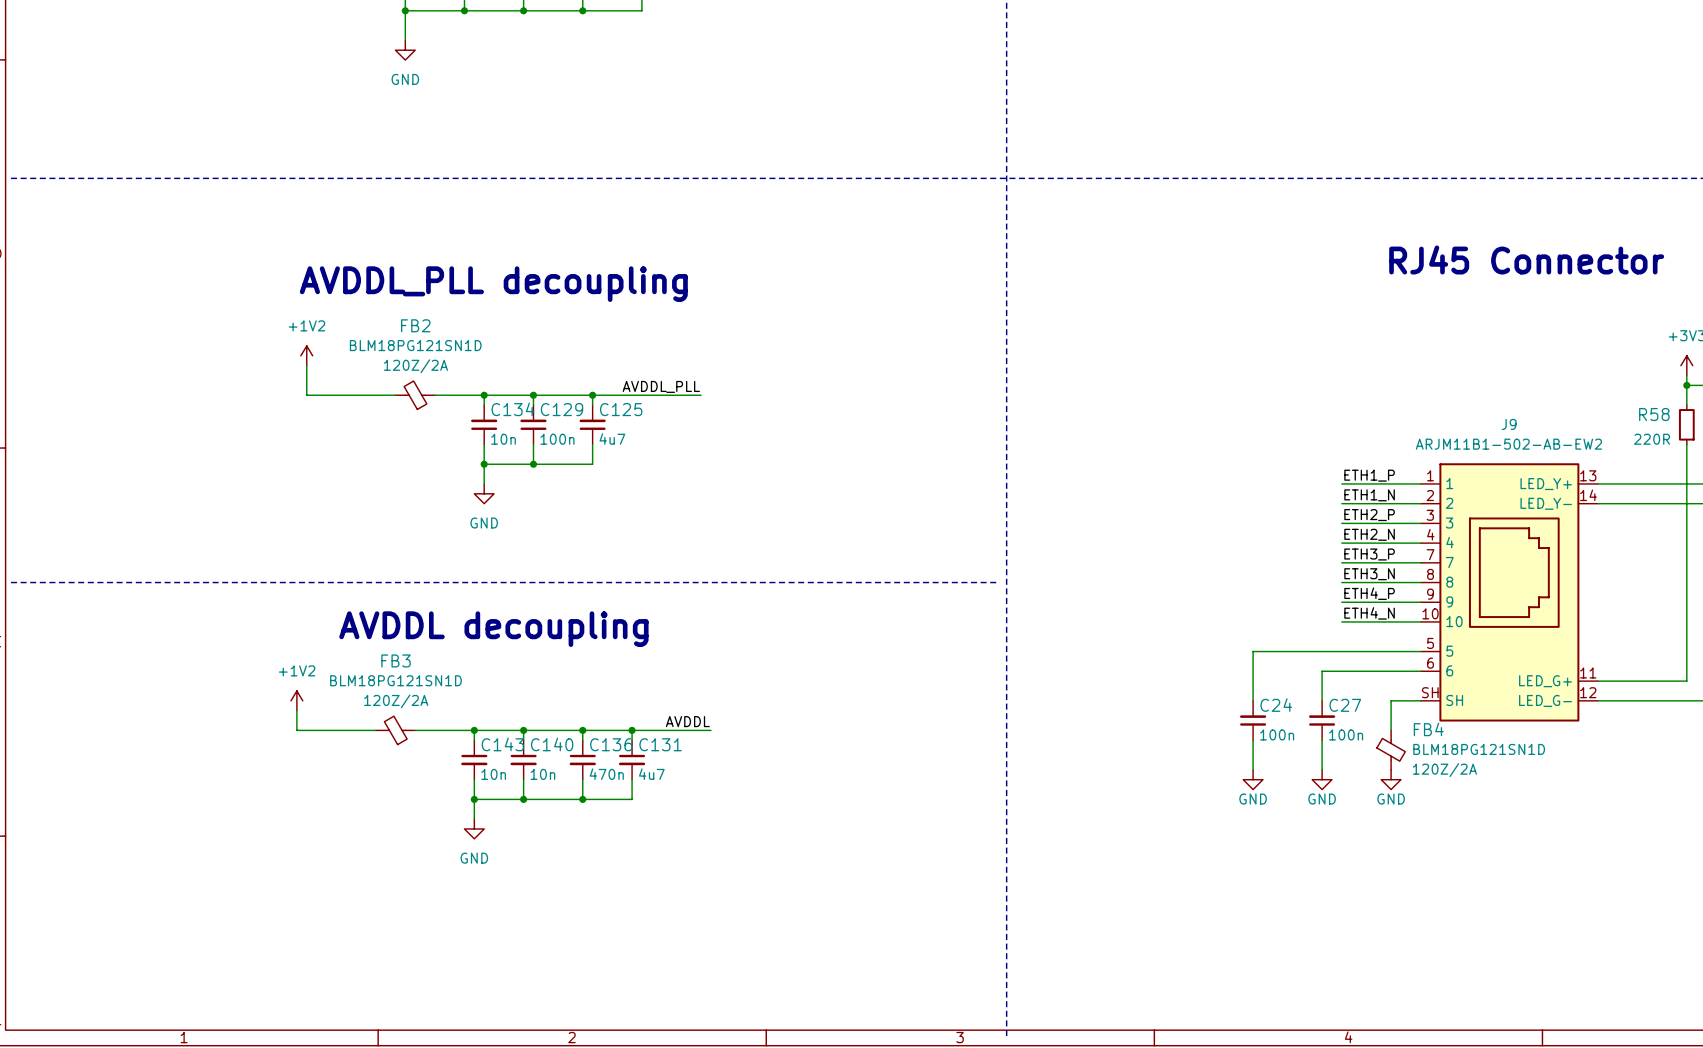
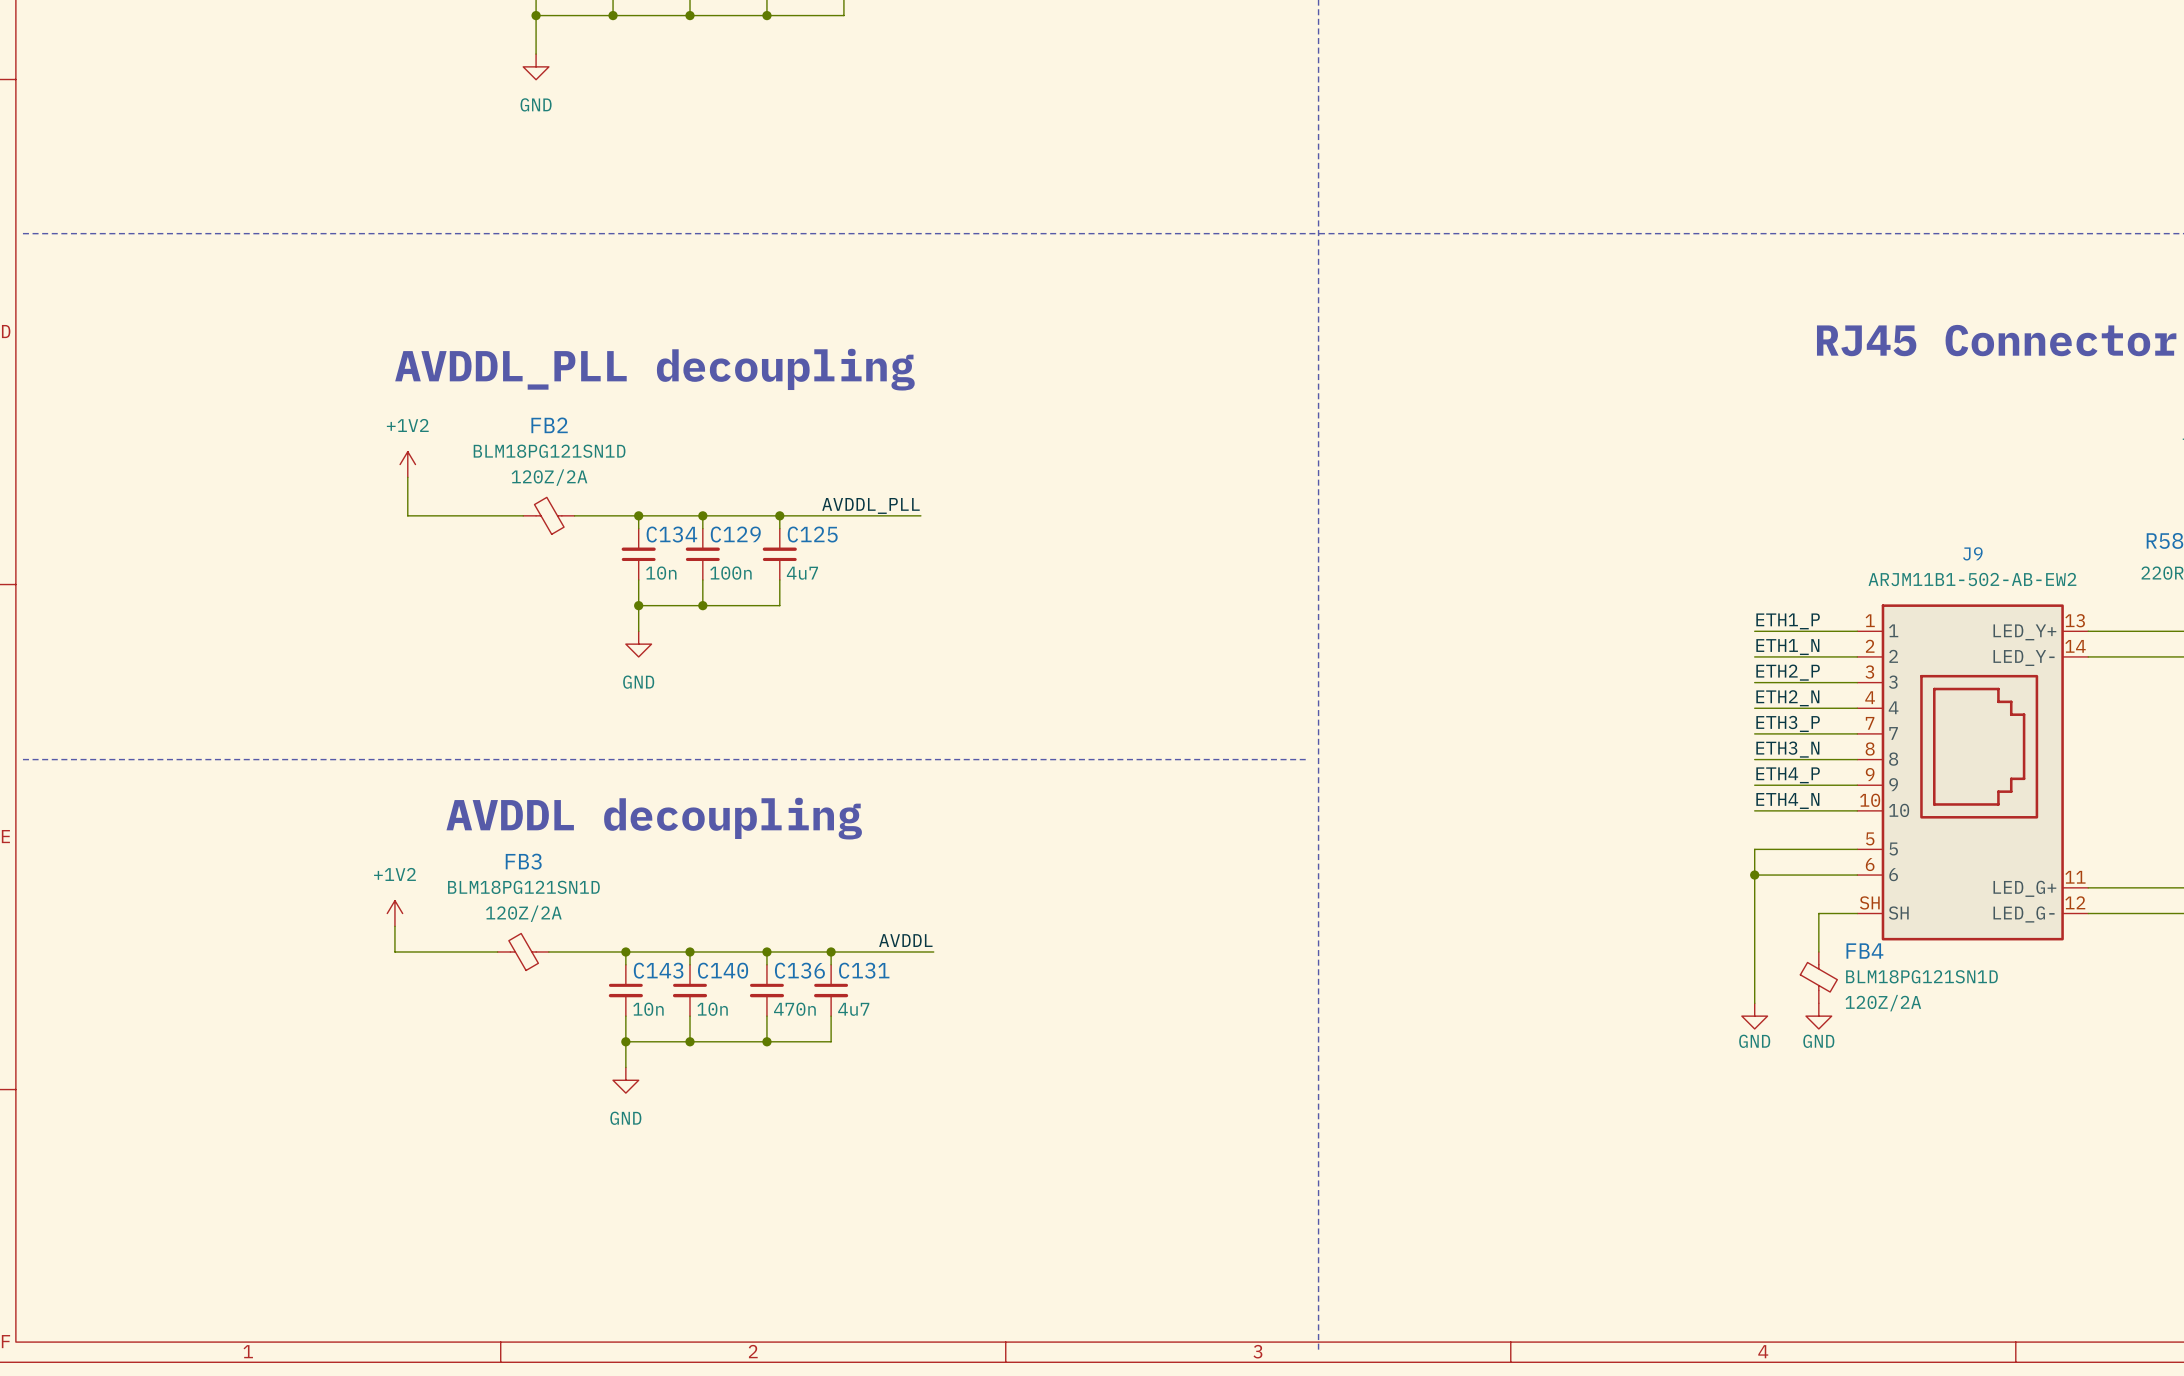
wire: (1341, 651) (1253, 651) (1253, 700) -> (1754, 849) (1754, 1003)
wire: (1341, 671) (1322, 671) (1322, 700) -> none
junction: none -> (1754, 875)
C24: (1253, 720) -> none
C27: (1322, 720) -> none
wire: (1253, 740) (1253, 769) -> none
wire: (1322, 740) (1322, 769) -> none
power symbol: GND (1253, 779) -> none
power symbol position: GND (1322, 779) -> GND (1754, 1016)

